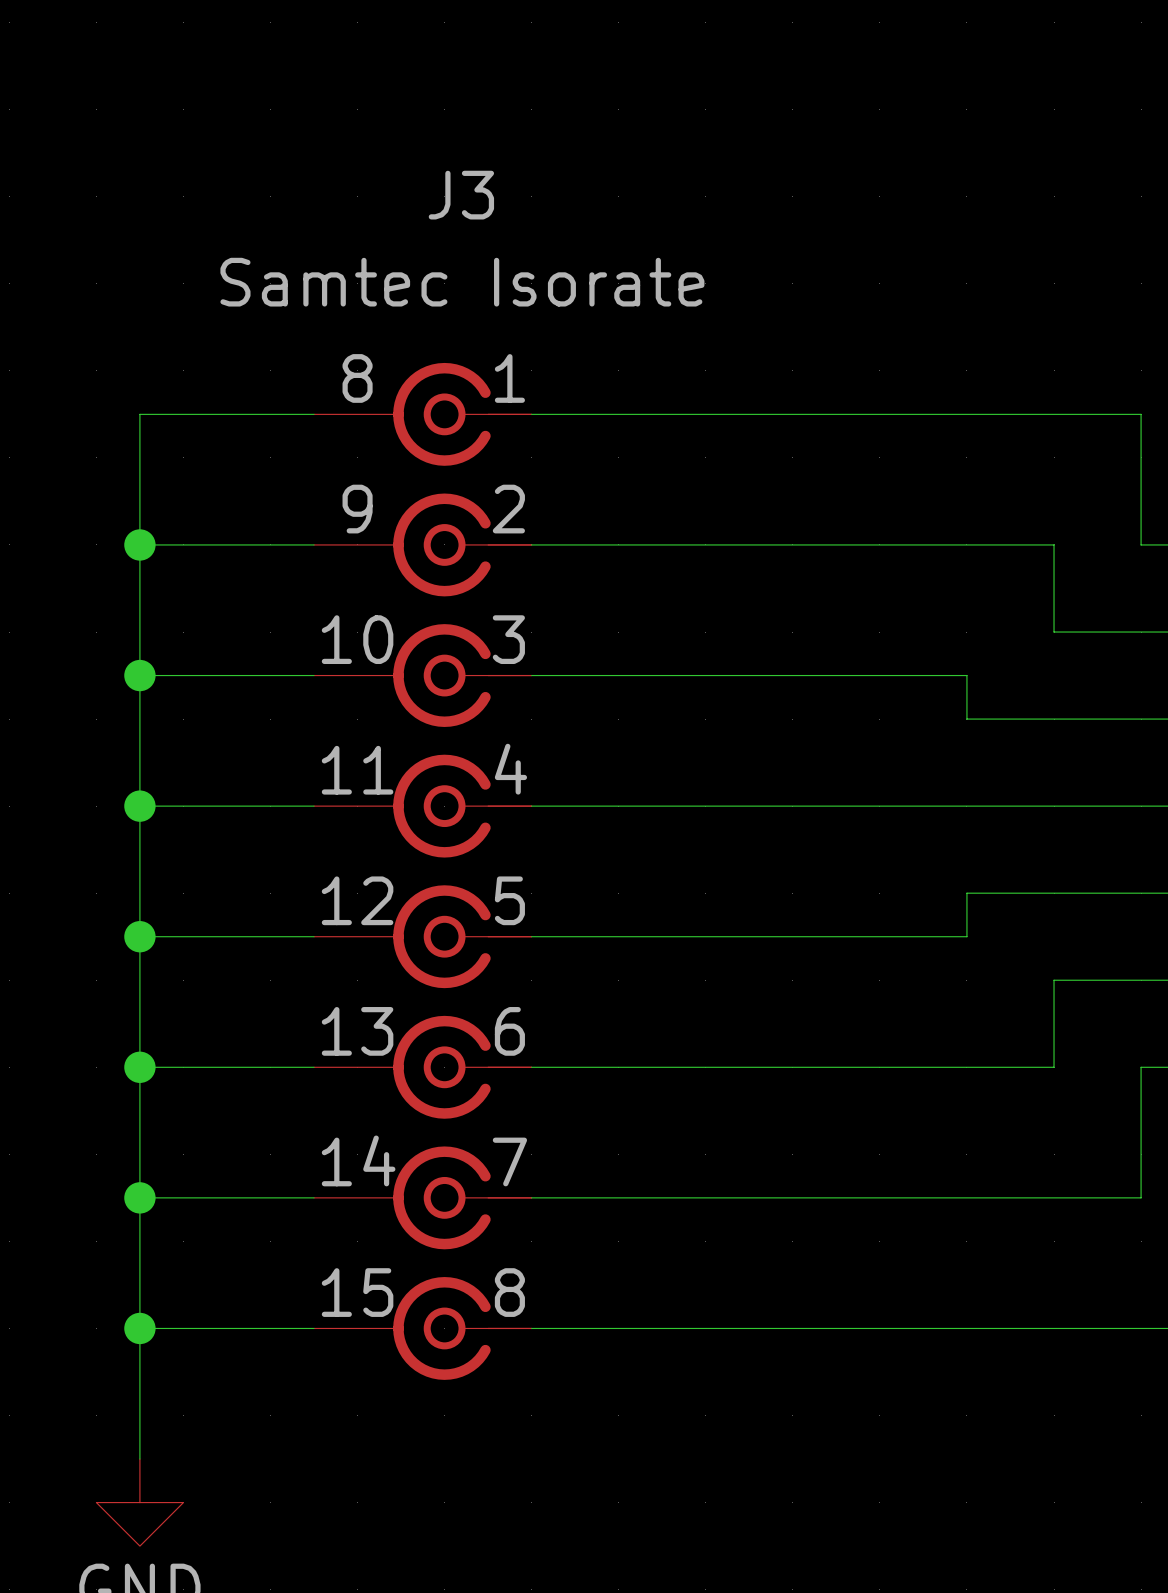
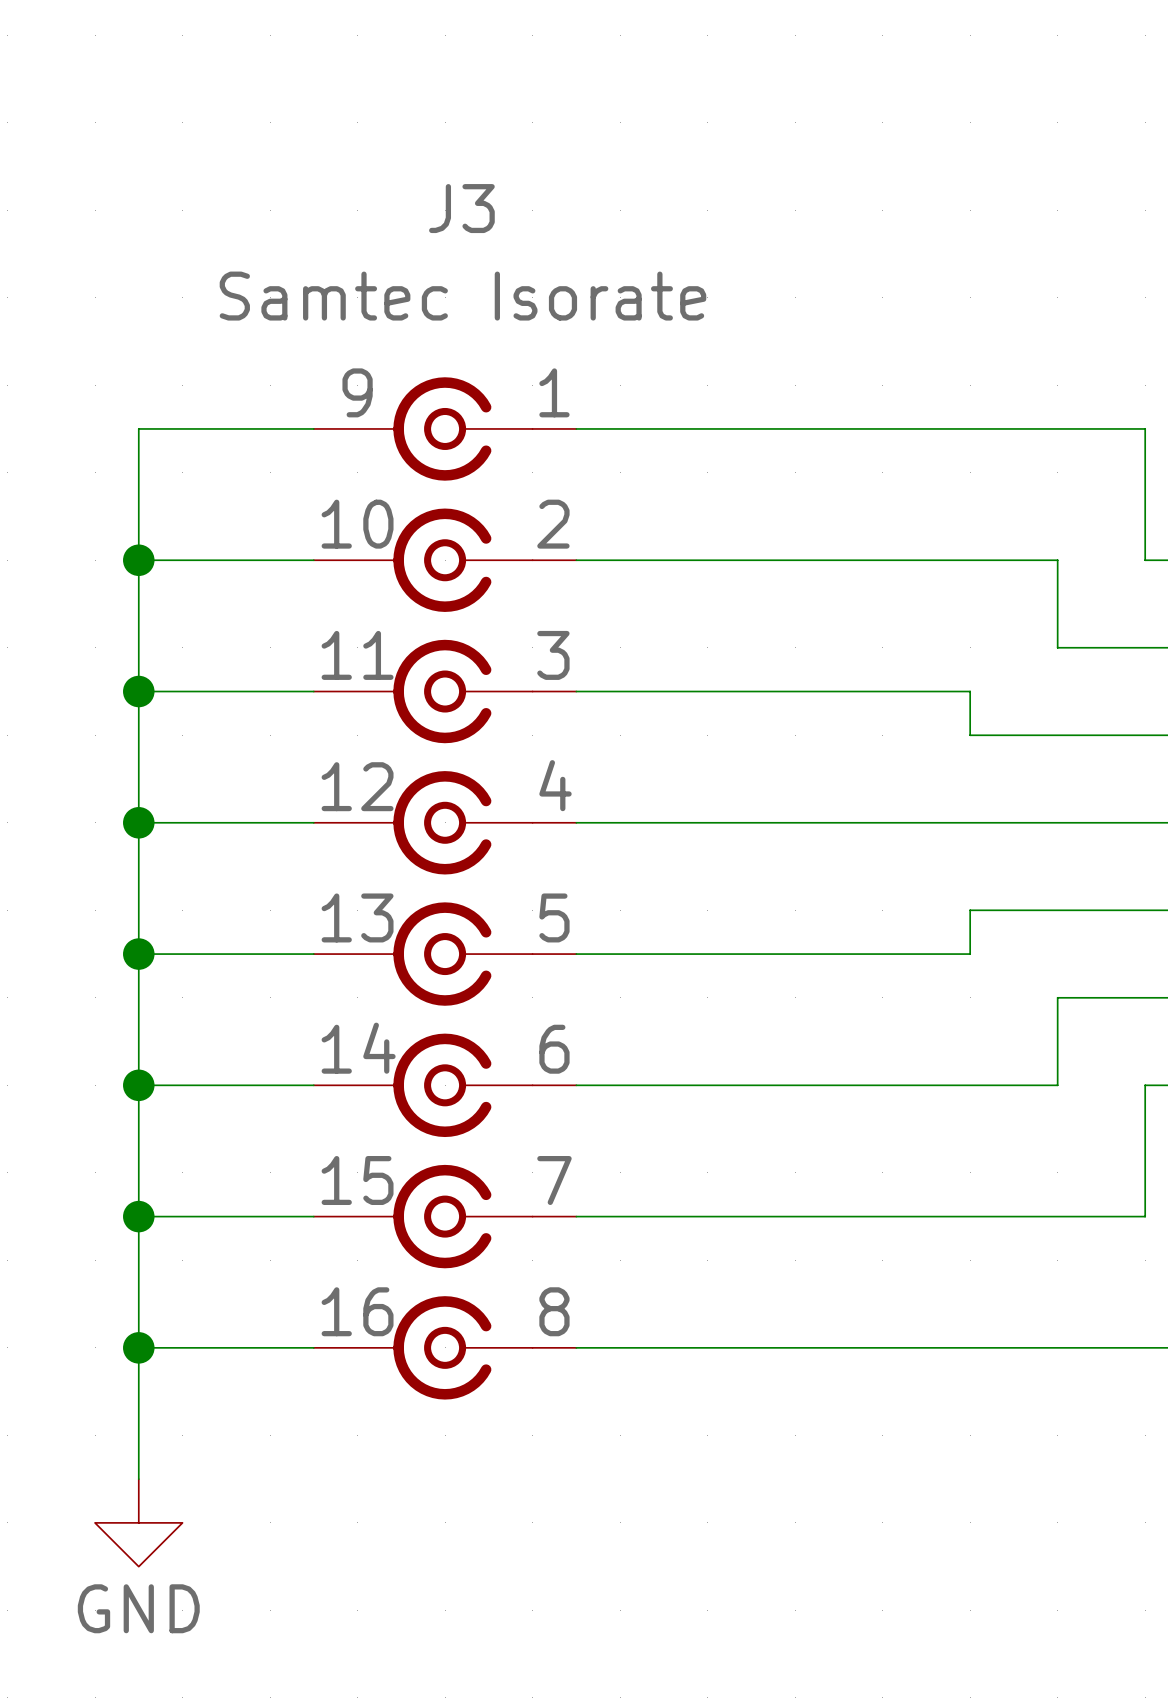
J3 symbol: [314, 362, 532, 1380] -> [313, 377, 577, 1400]

